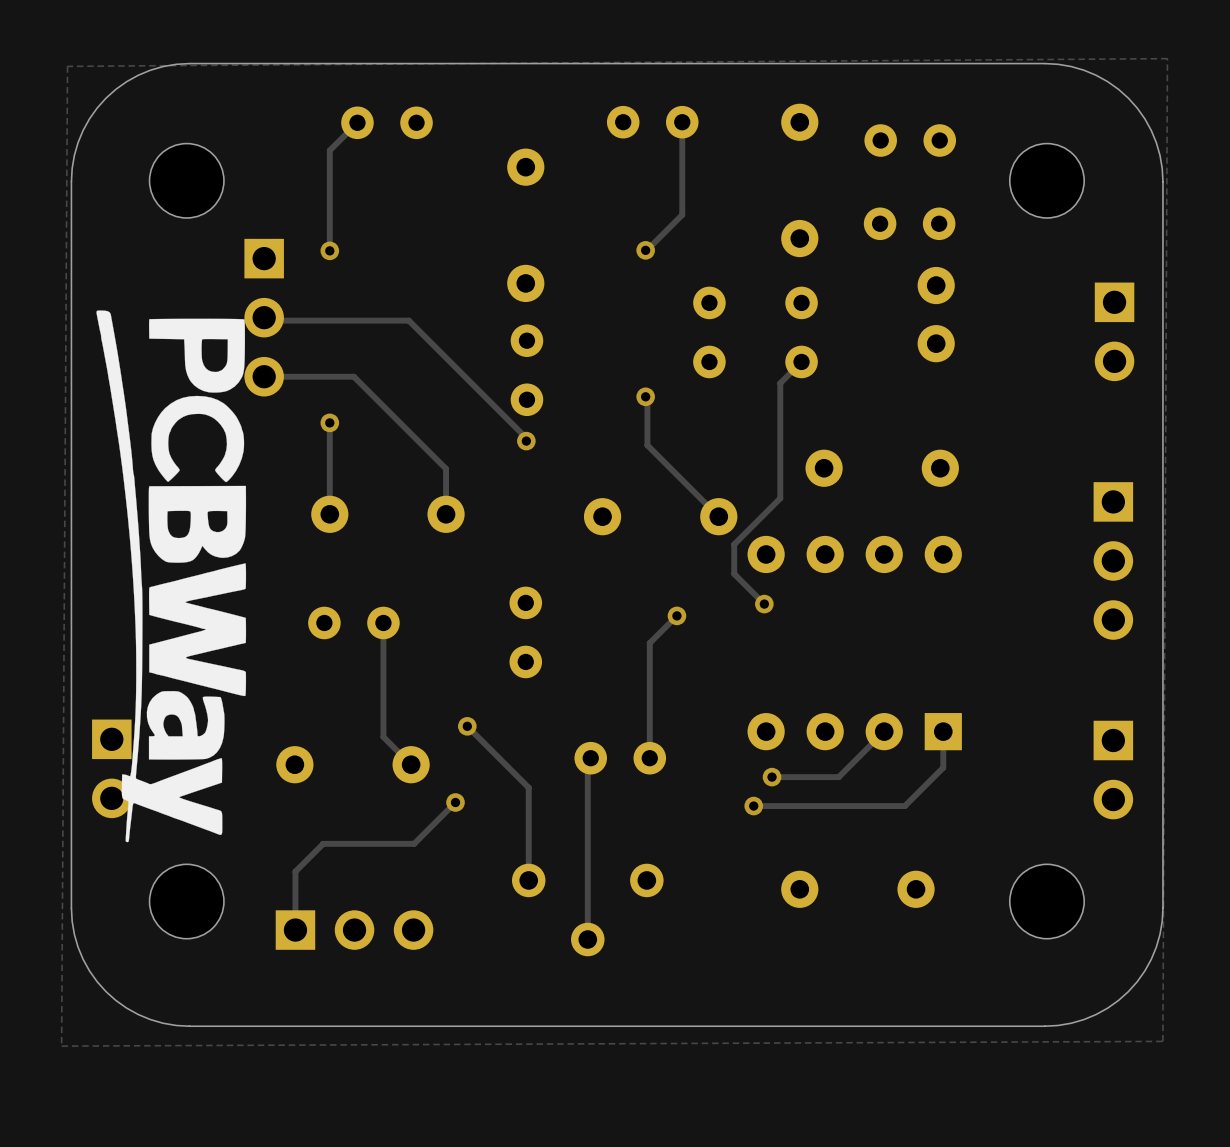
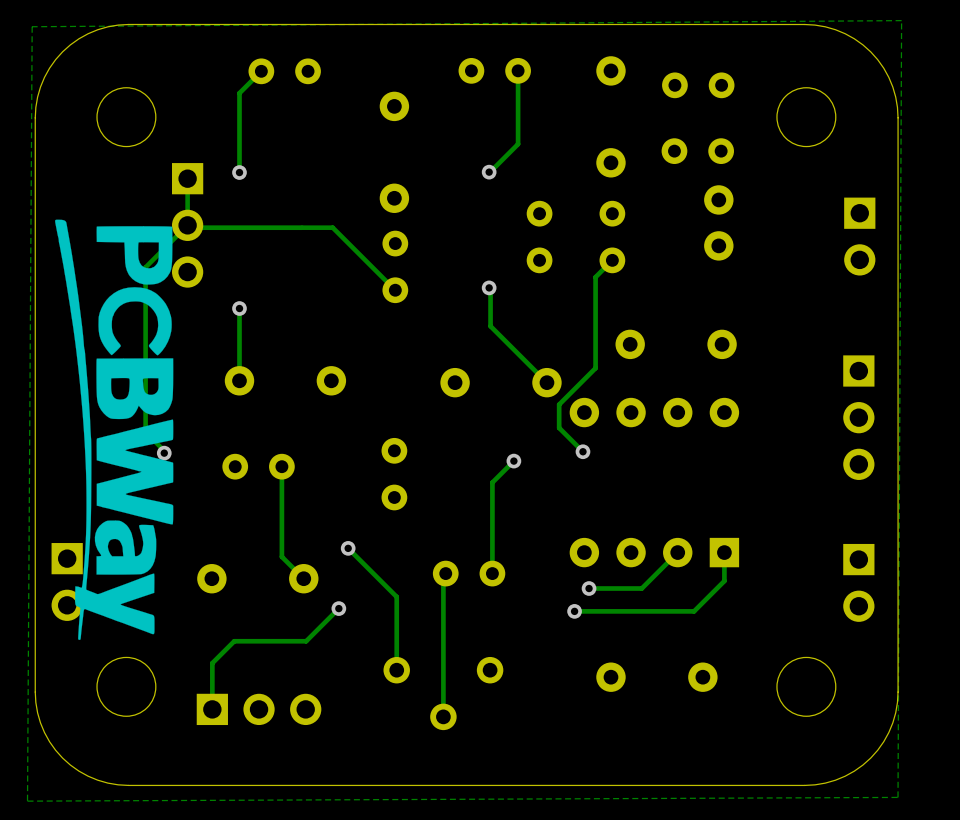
track: none -> (187, 178) (187, 225) (145, 267) (145, 432) (164, 450) (164, 453)
track: (408, 320) (526, 438) (526, 441) -> (301, 227) (332, 227) (395, 290)
track: (264, 376) (353, 376) (446, 468) (446, 514) -> none
via: (526, 441) -> none
via: none -> (164, 453)

